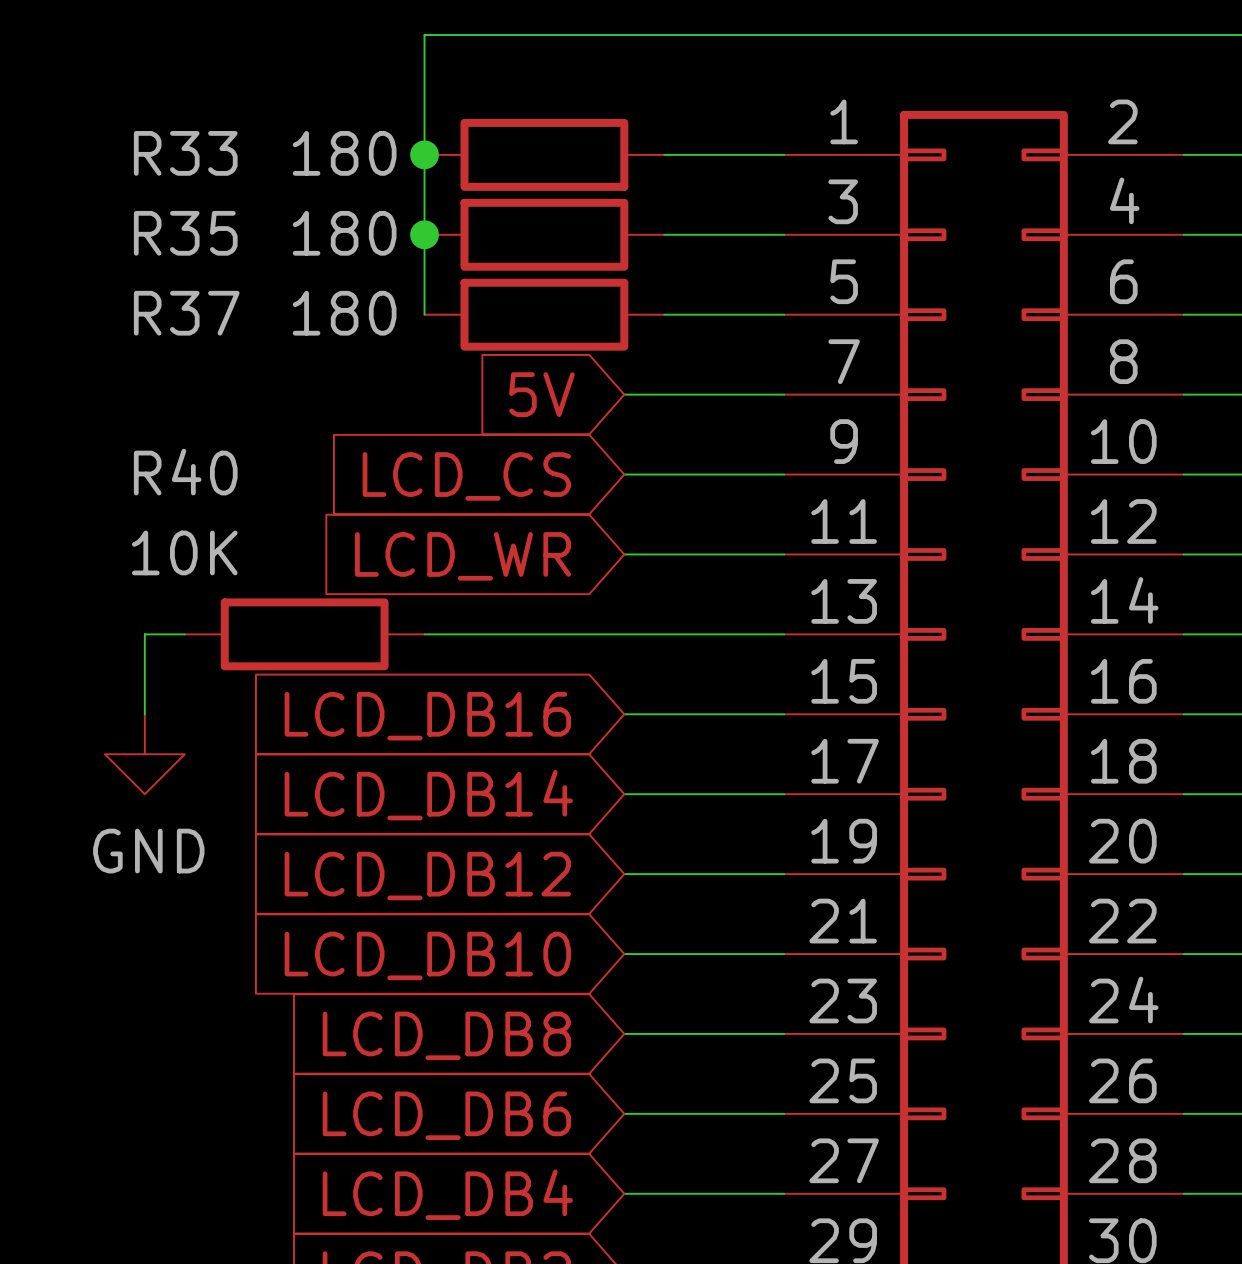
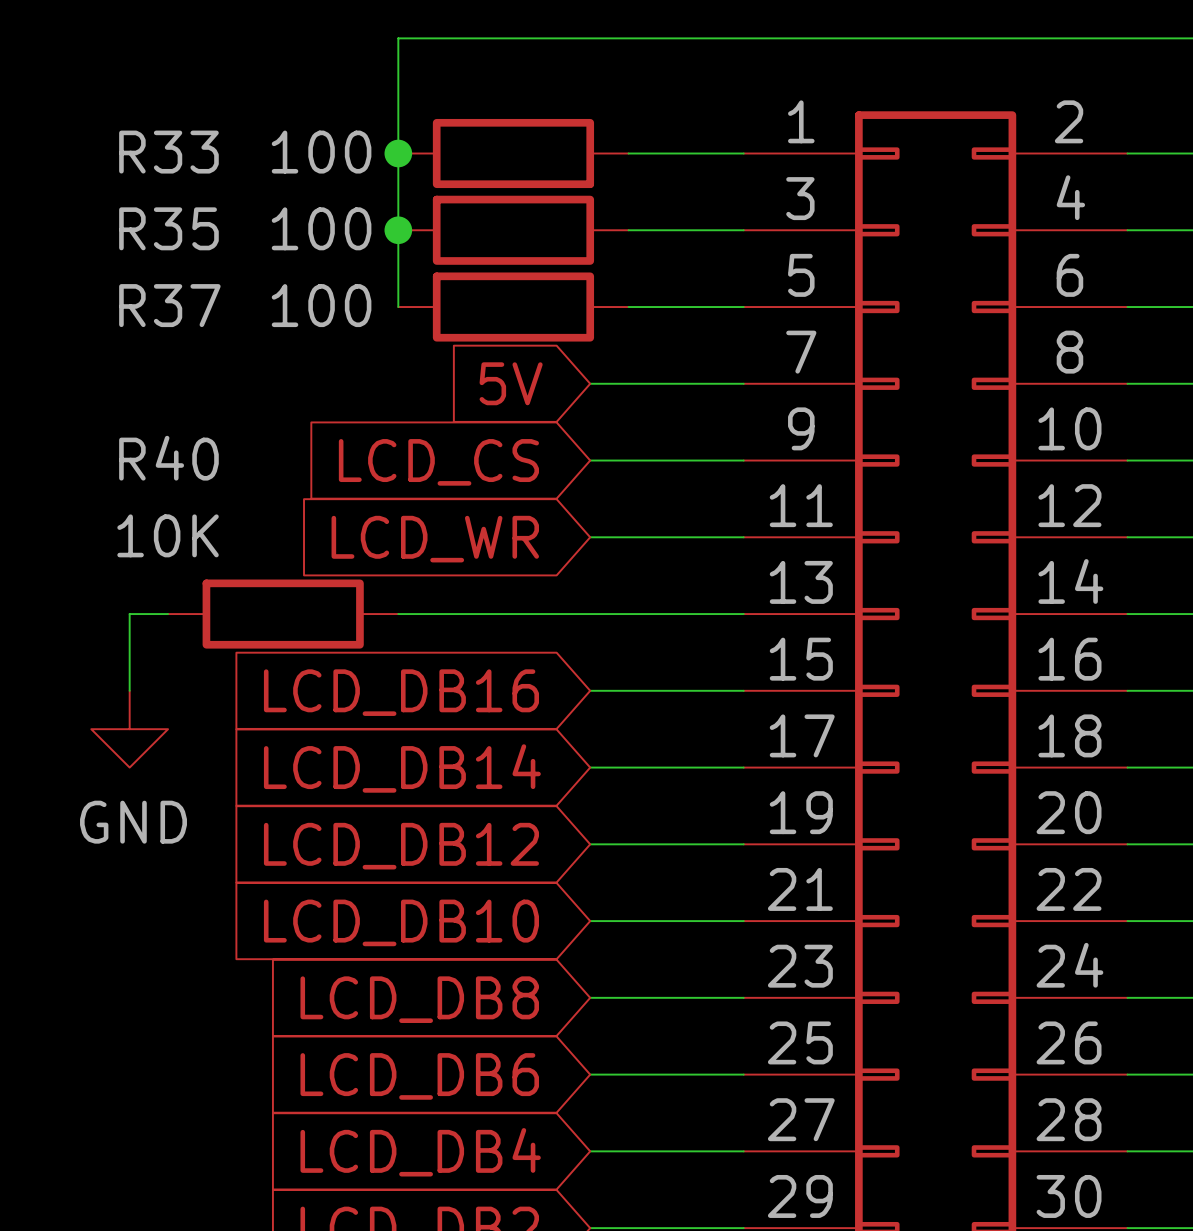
R33 value: 180 (344, 153) -> 100 (321, 152)
R37 value: 180 (344, 233) -> 100 (321, 228)
R35 value: 180 (344, 313) -> 100 (321, 305)

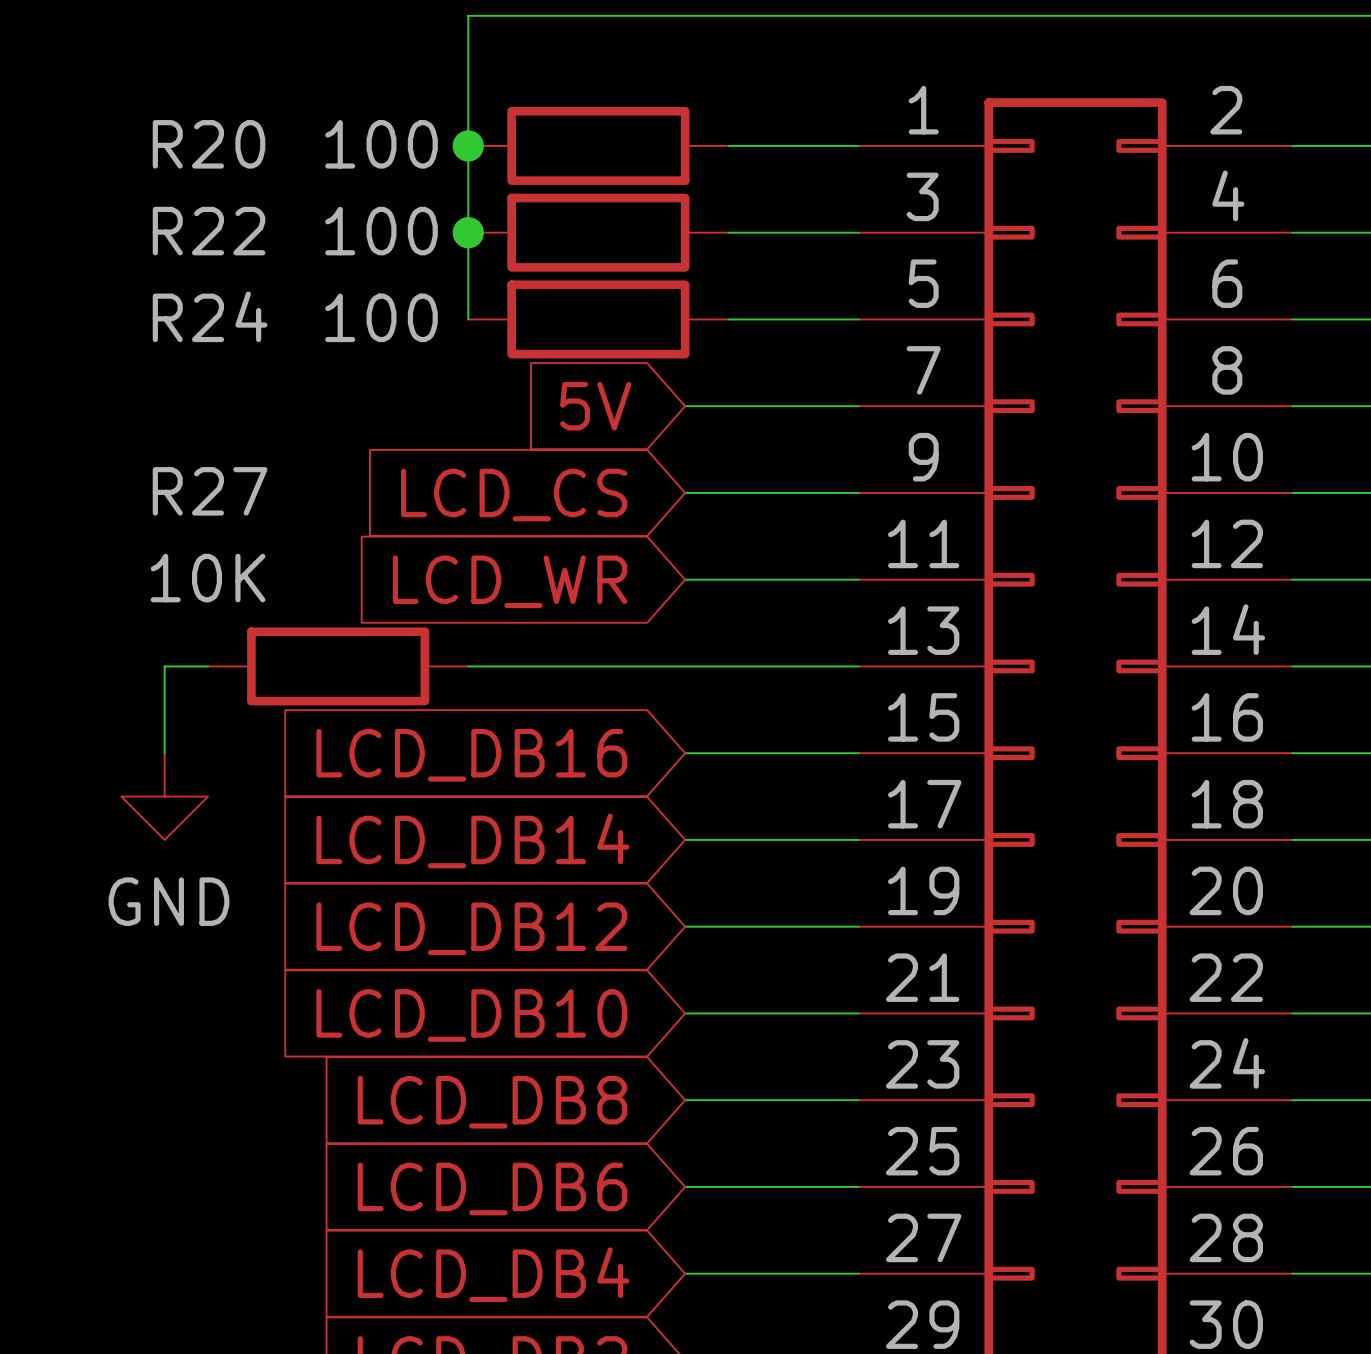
R33 name: R33 (168, 152) -> R20 (209, 144)
R35 name: R35 (168, 228) -> R22 (209, 231)
R37 name: R37 (169, 305) -> R24 (210, 316)
R40 name: R40 (168, 458) -> R27 (210, 491)

